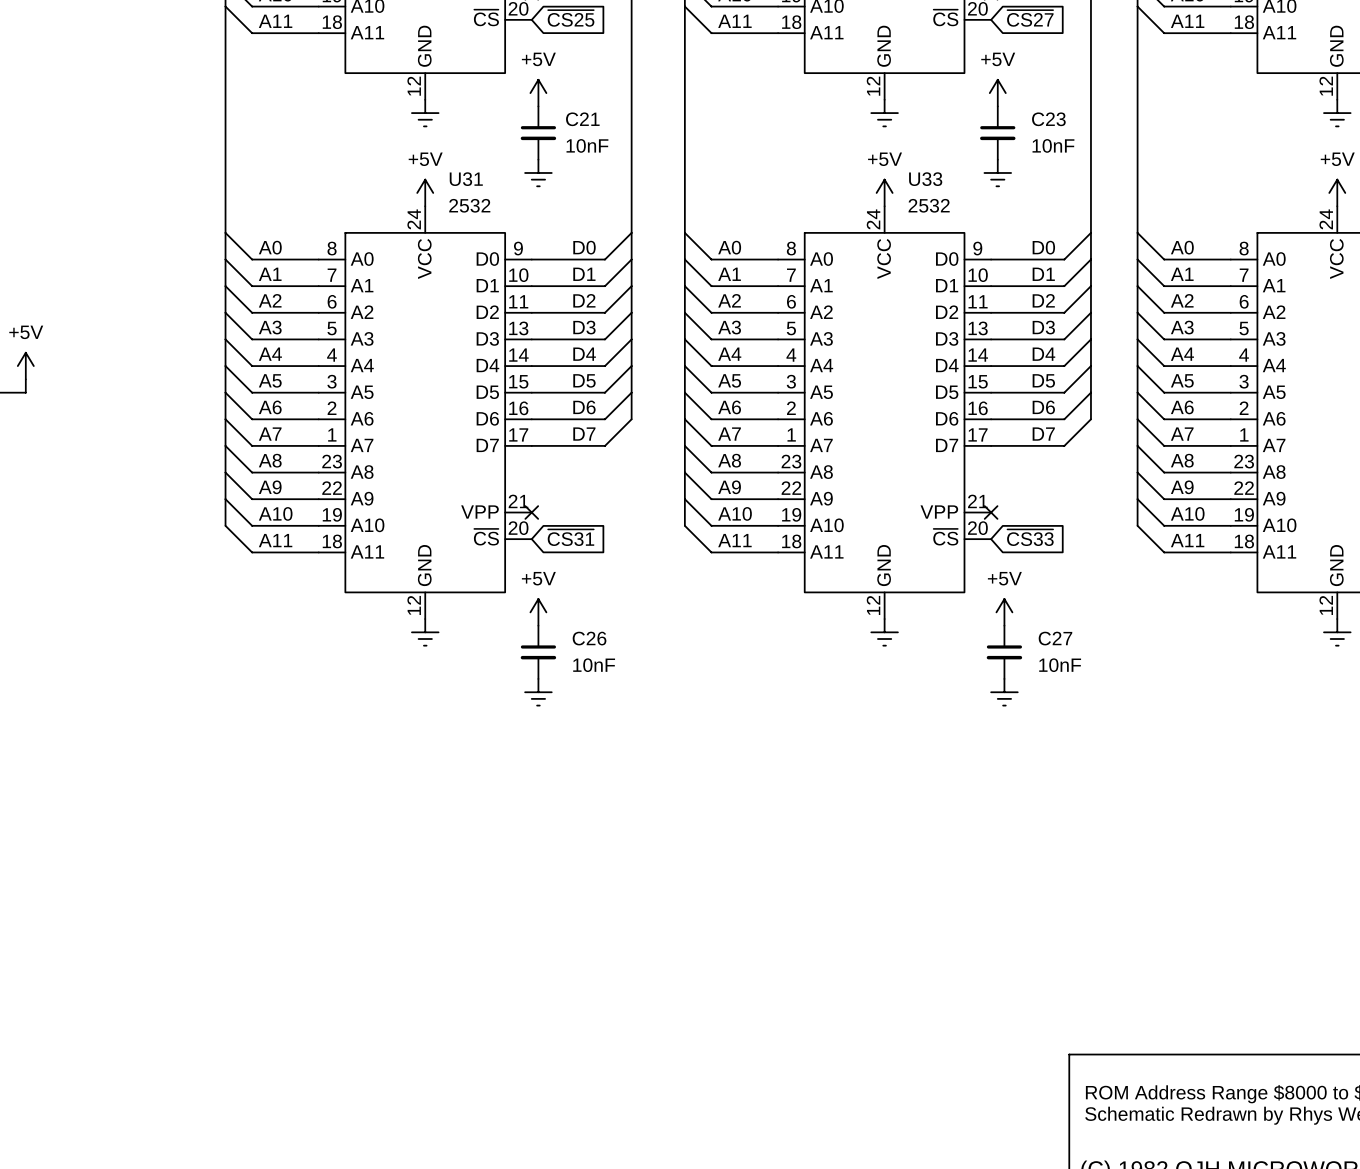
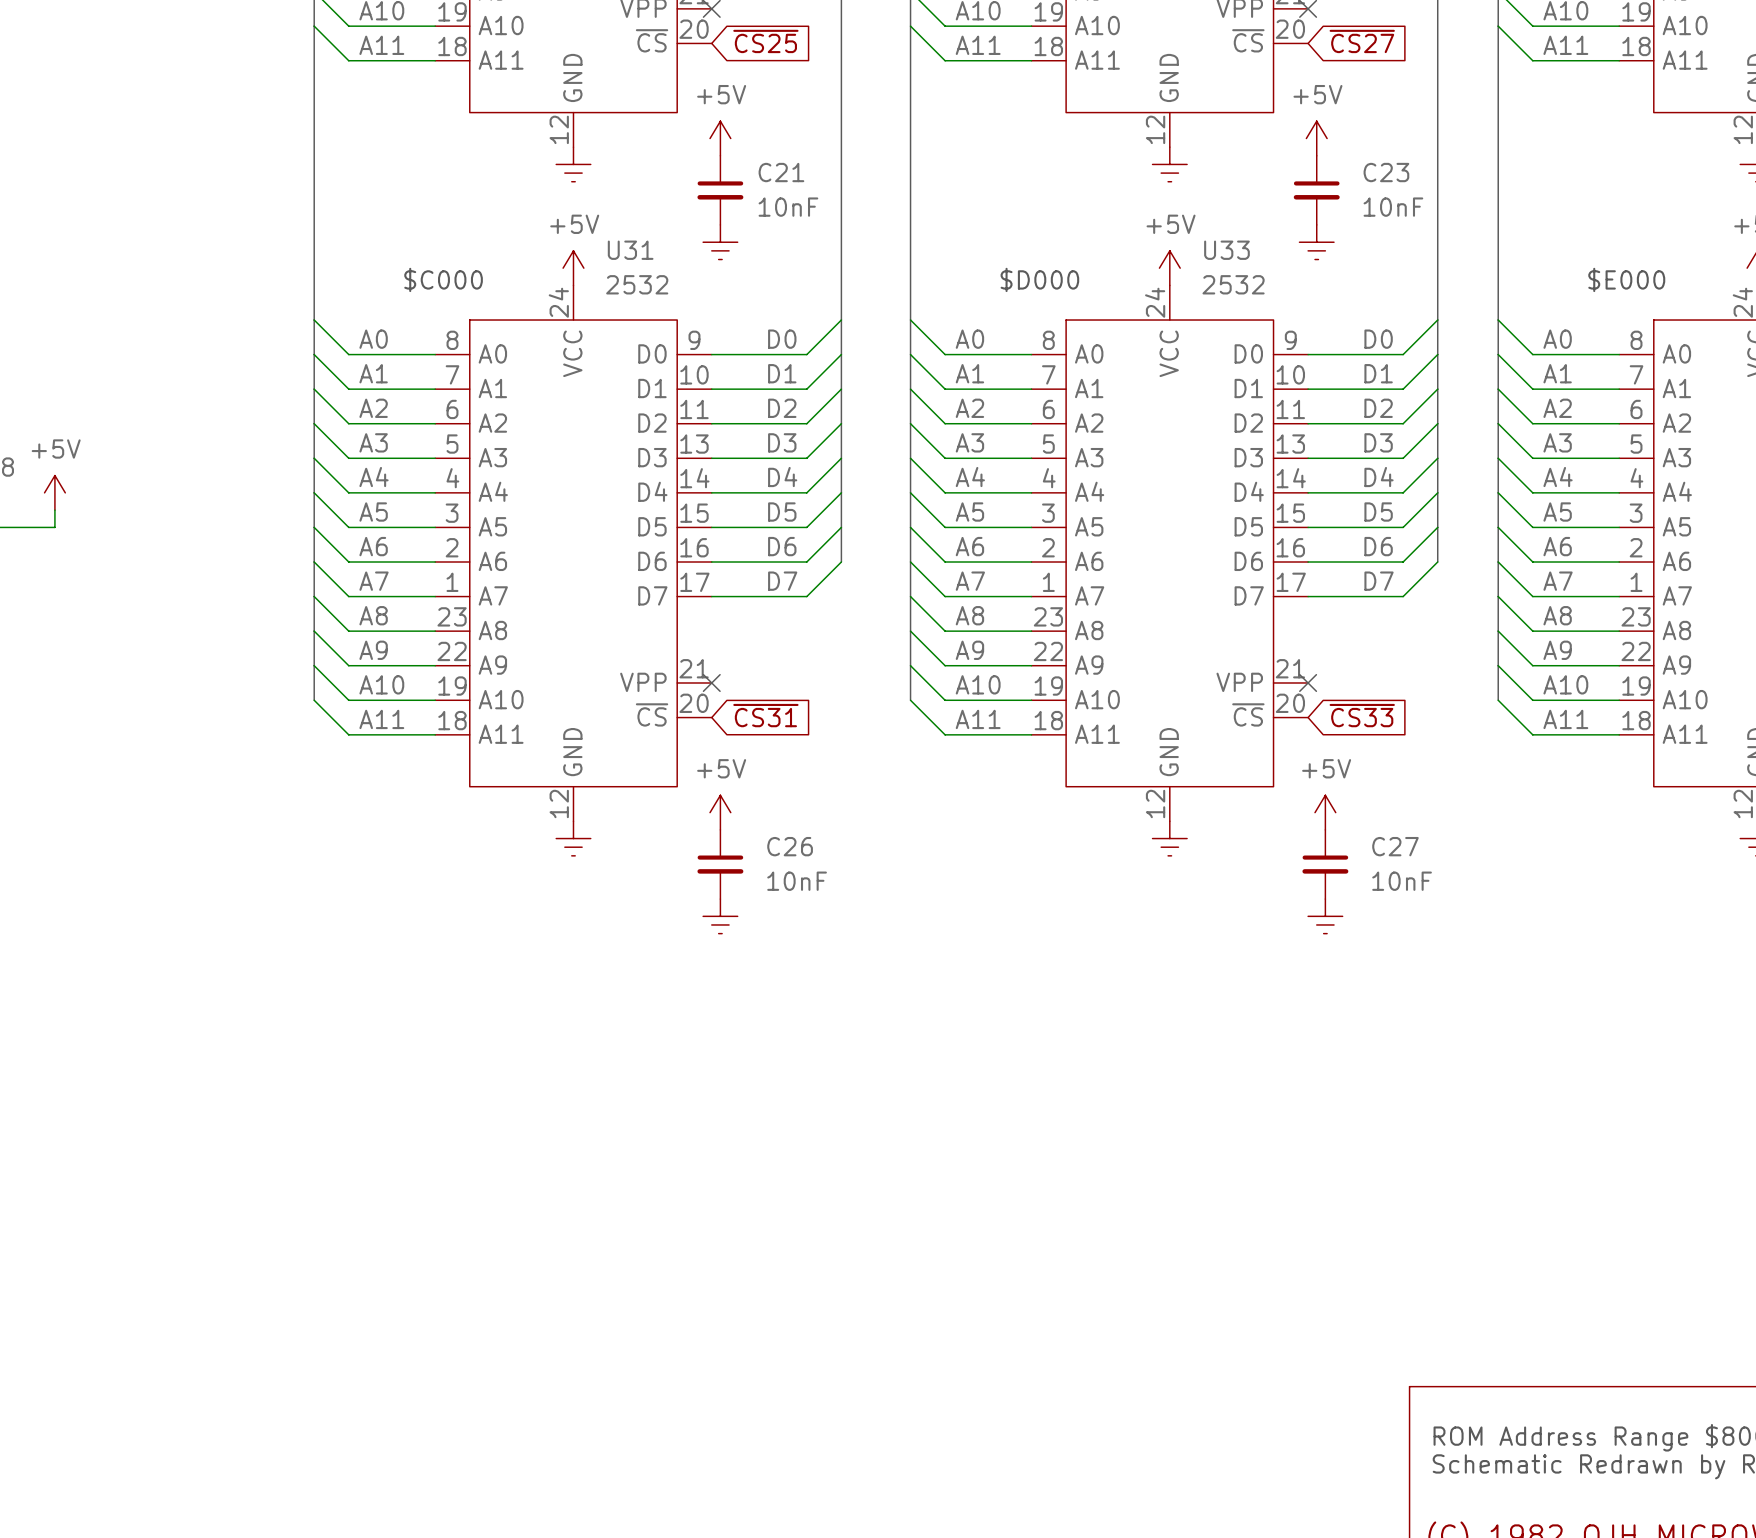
text: none -> $C000 (443, 279)
text: none -> $D000 (1039, 279)
text: none -> $E000 (1626, 279)

